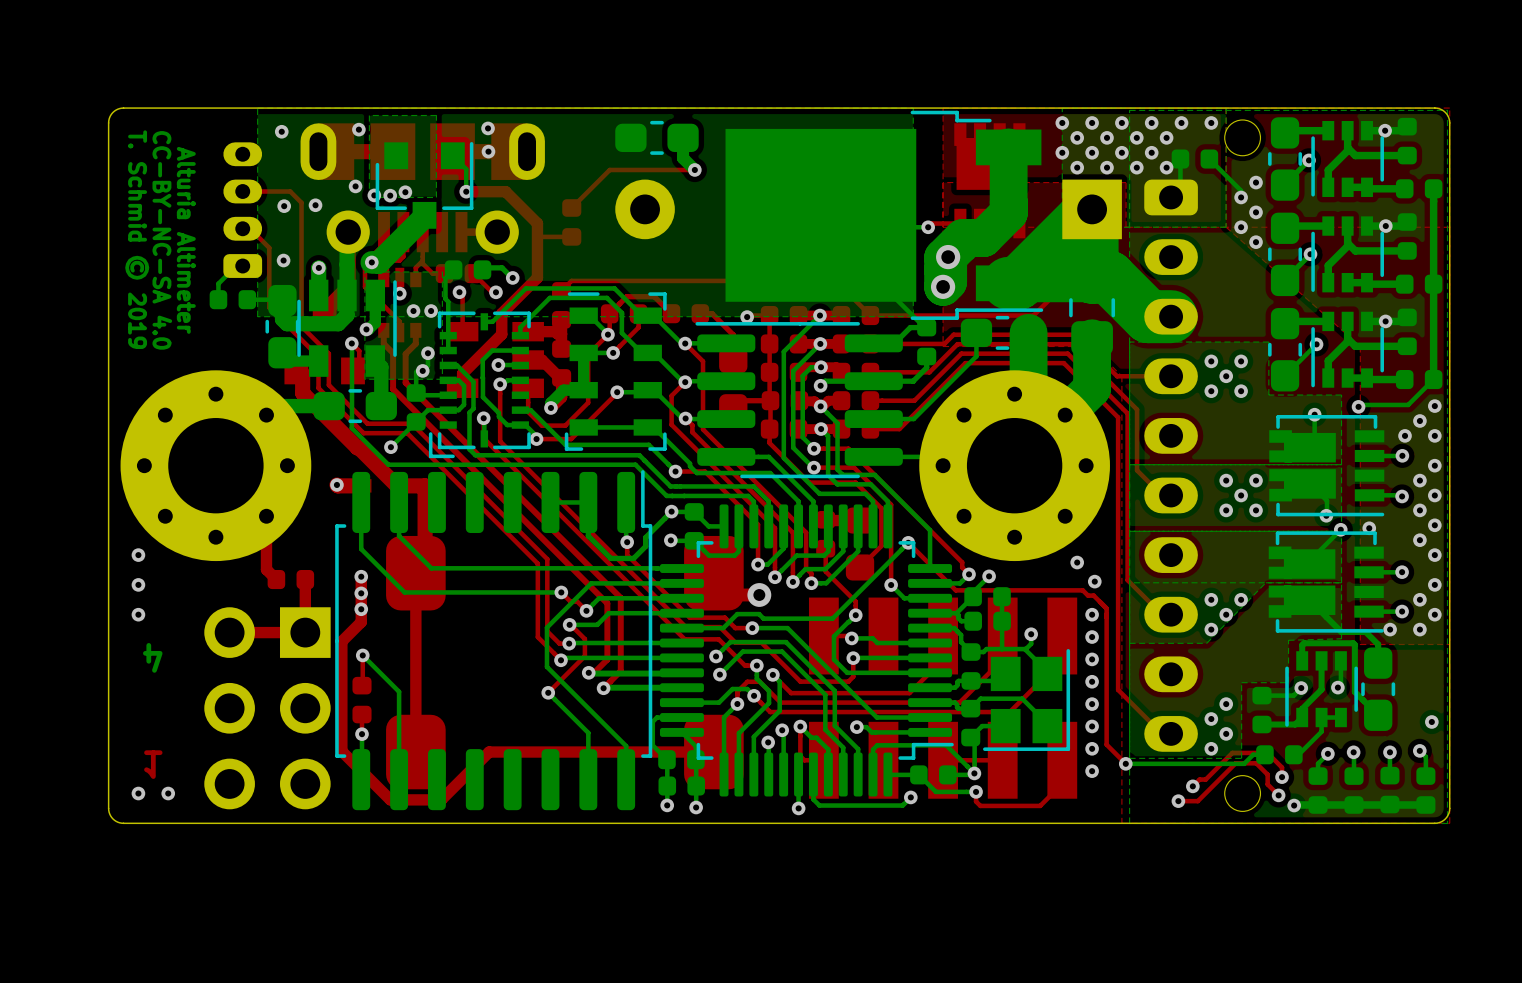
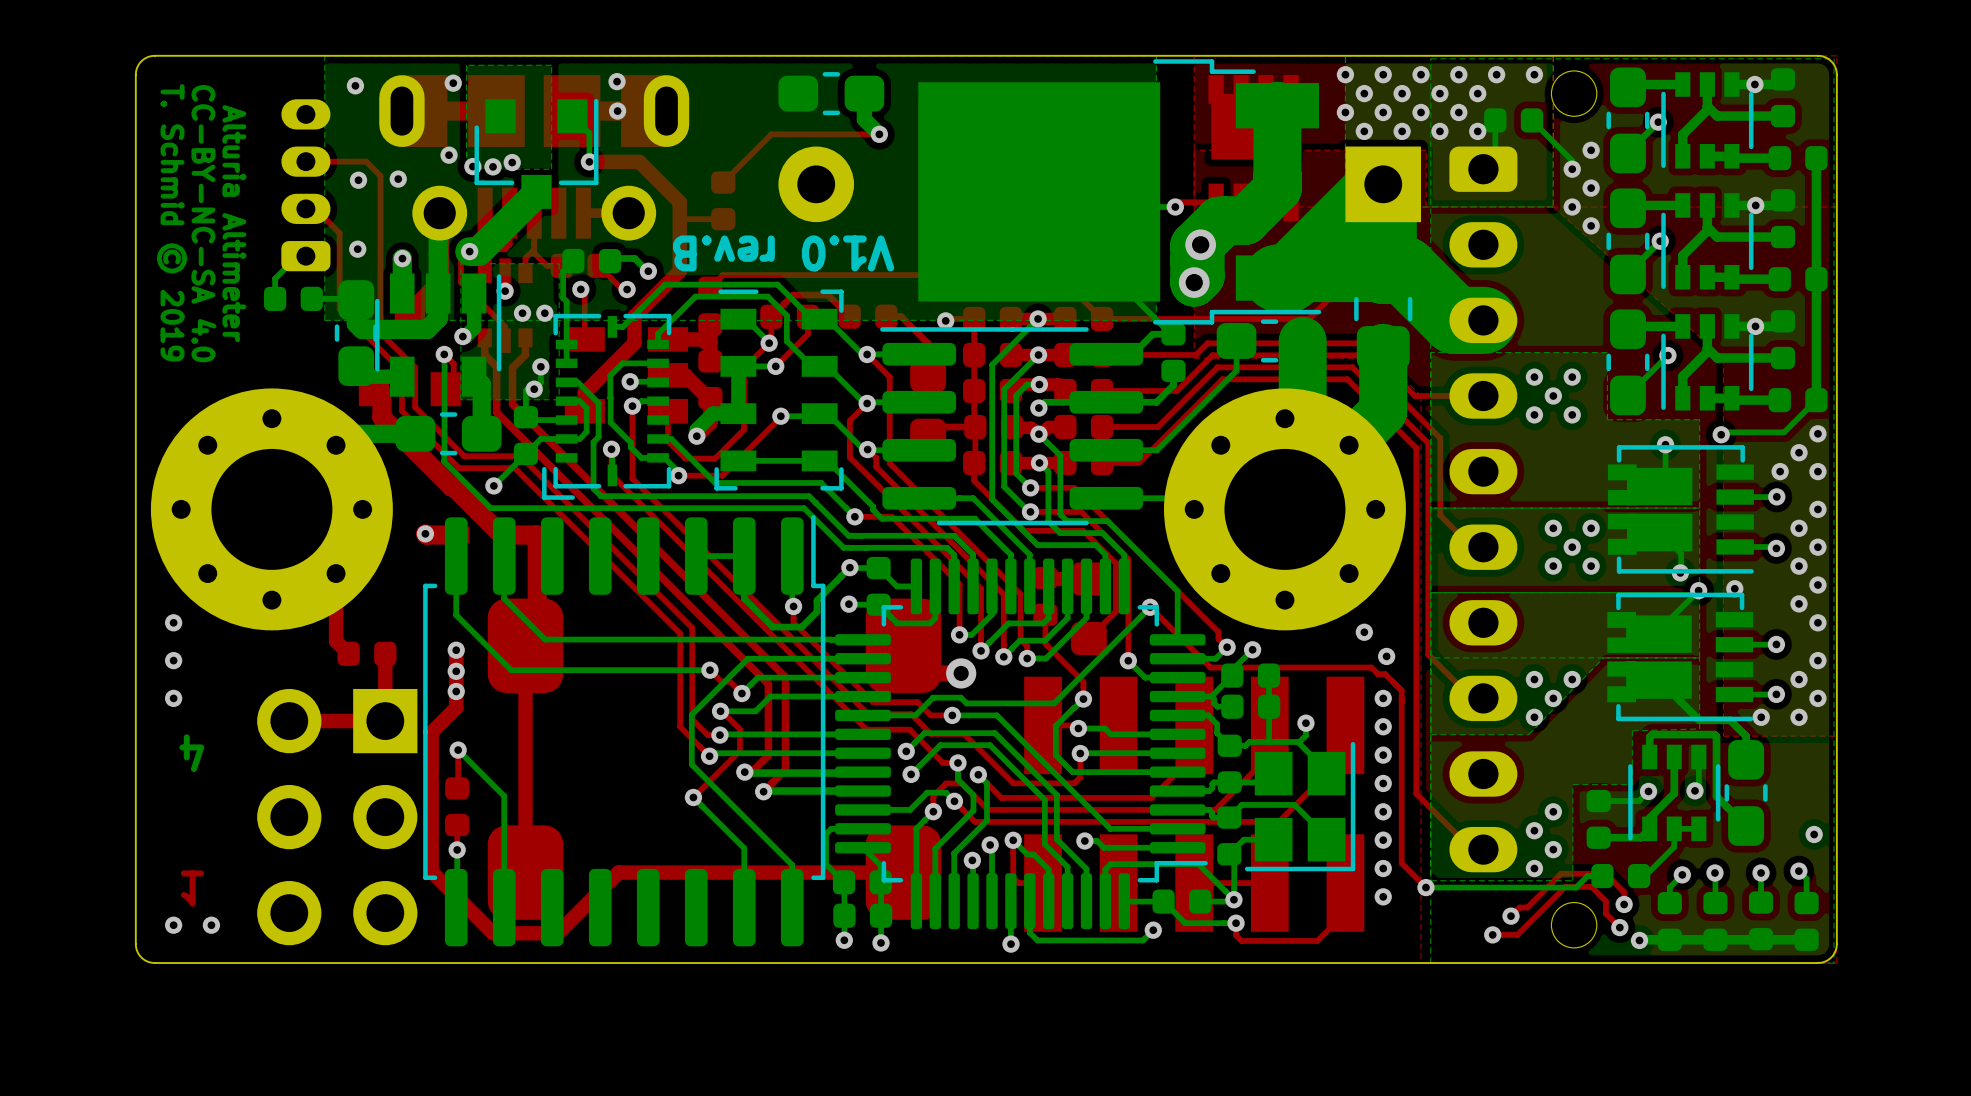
text: none -> V1.0 rev.B (783, 253)

